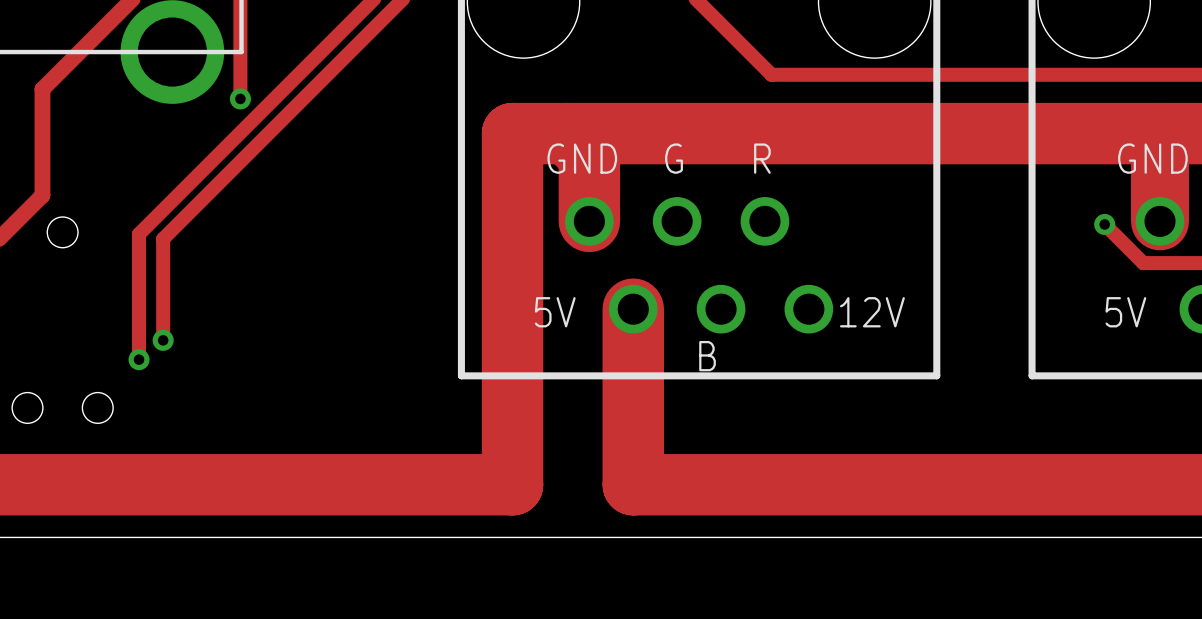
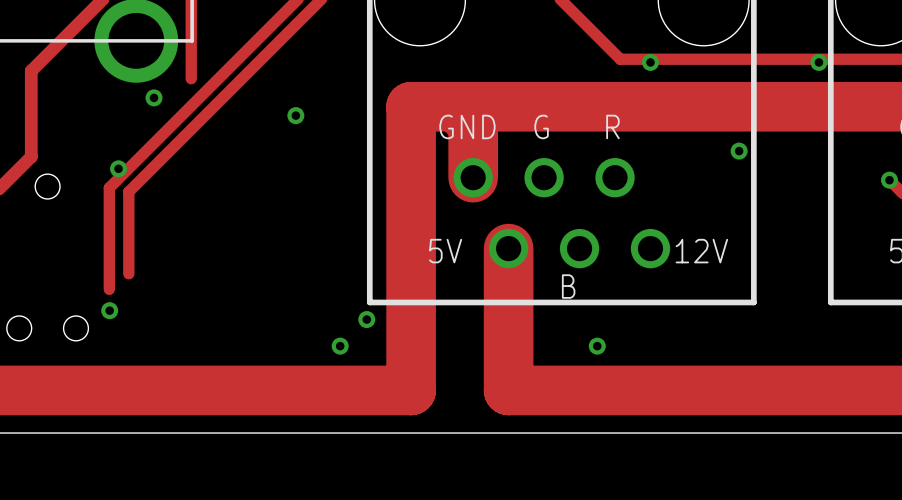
via: none -> (650, 62)
via: none -> (818, 62)
via position: (240, 98) -> (154, 97)
via: none -> (295, 115)
via: none -> (739, 151)
via: none -> (118, 168)
via: (163, 340) -> none
via: (139, 359) -> none
via: none -> (109, 310)
via: none -> (366, 319)
via: none -> (340, 346)
via: none -> (597, 346)

